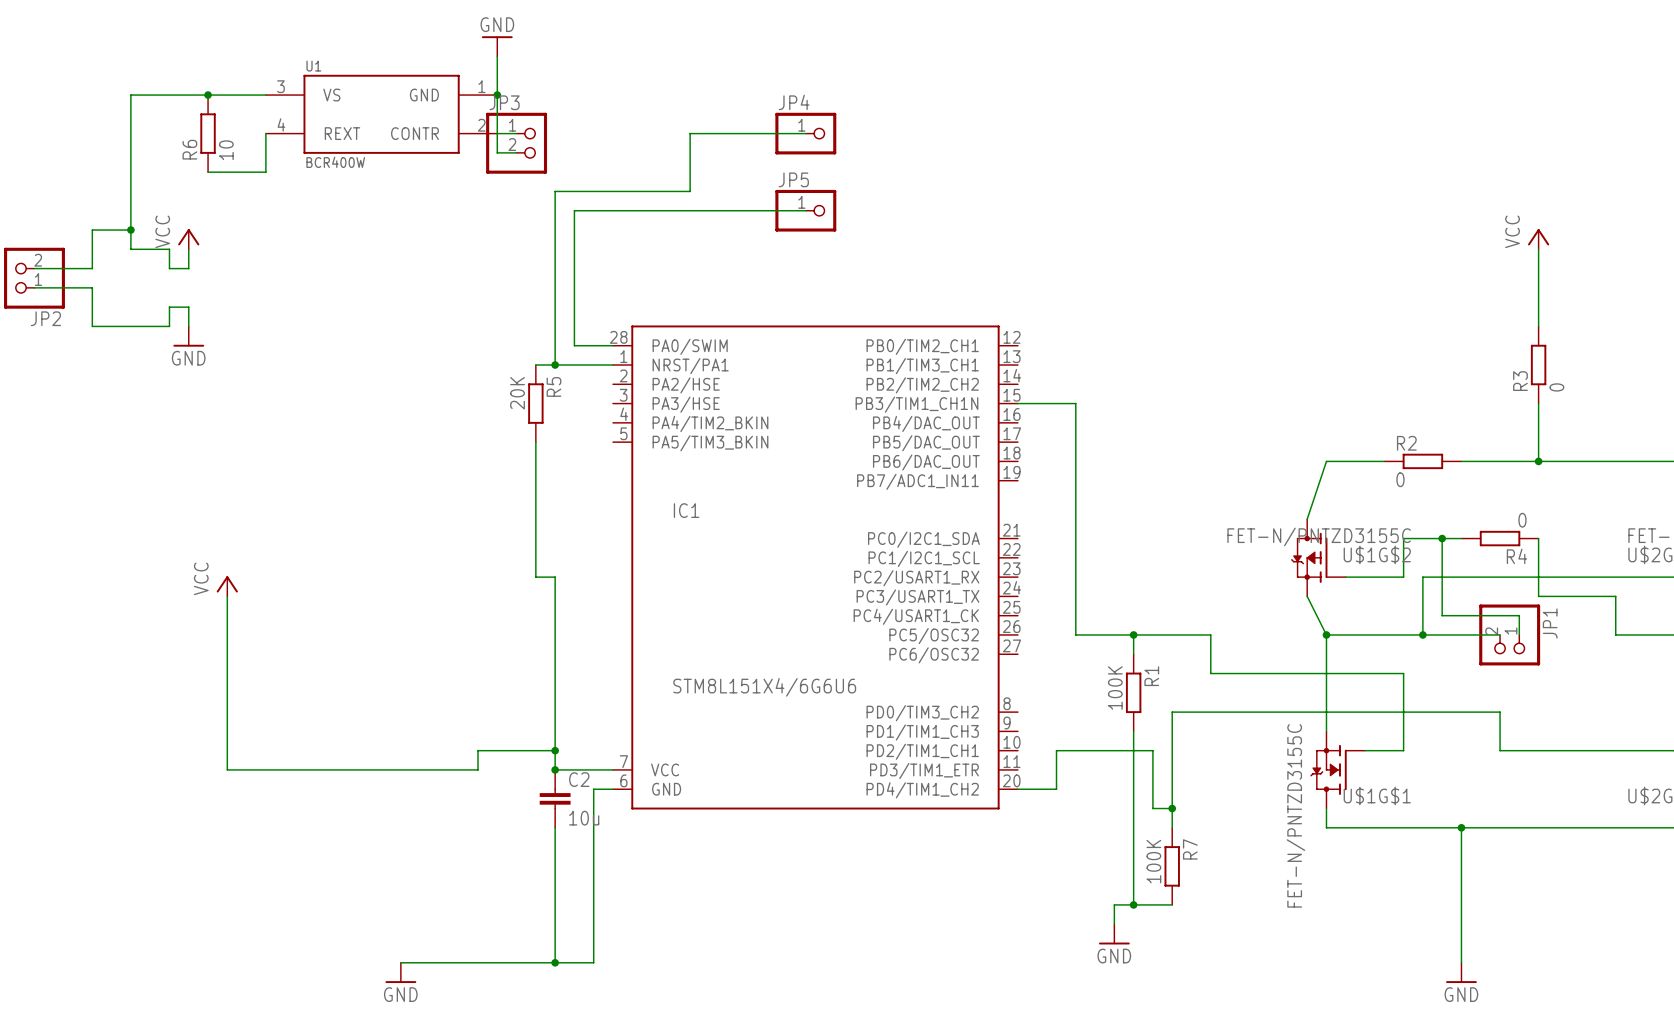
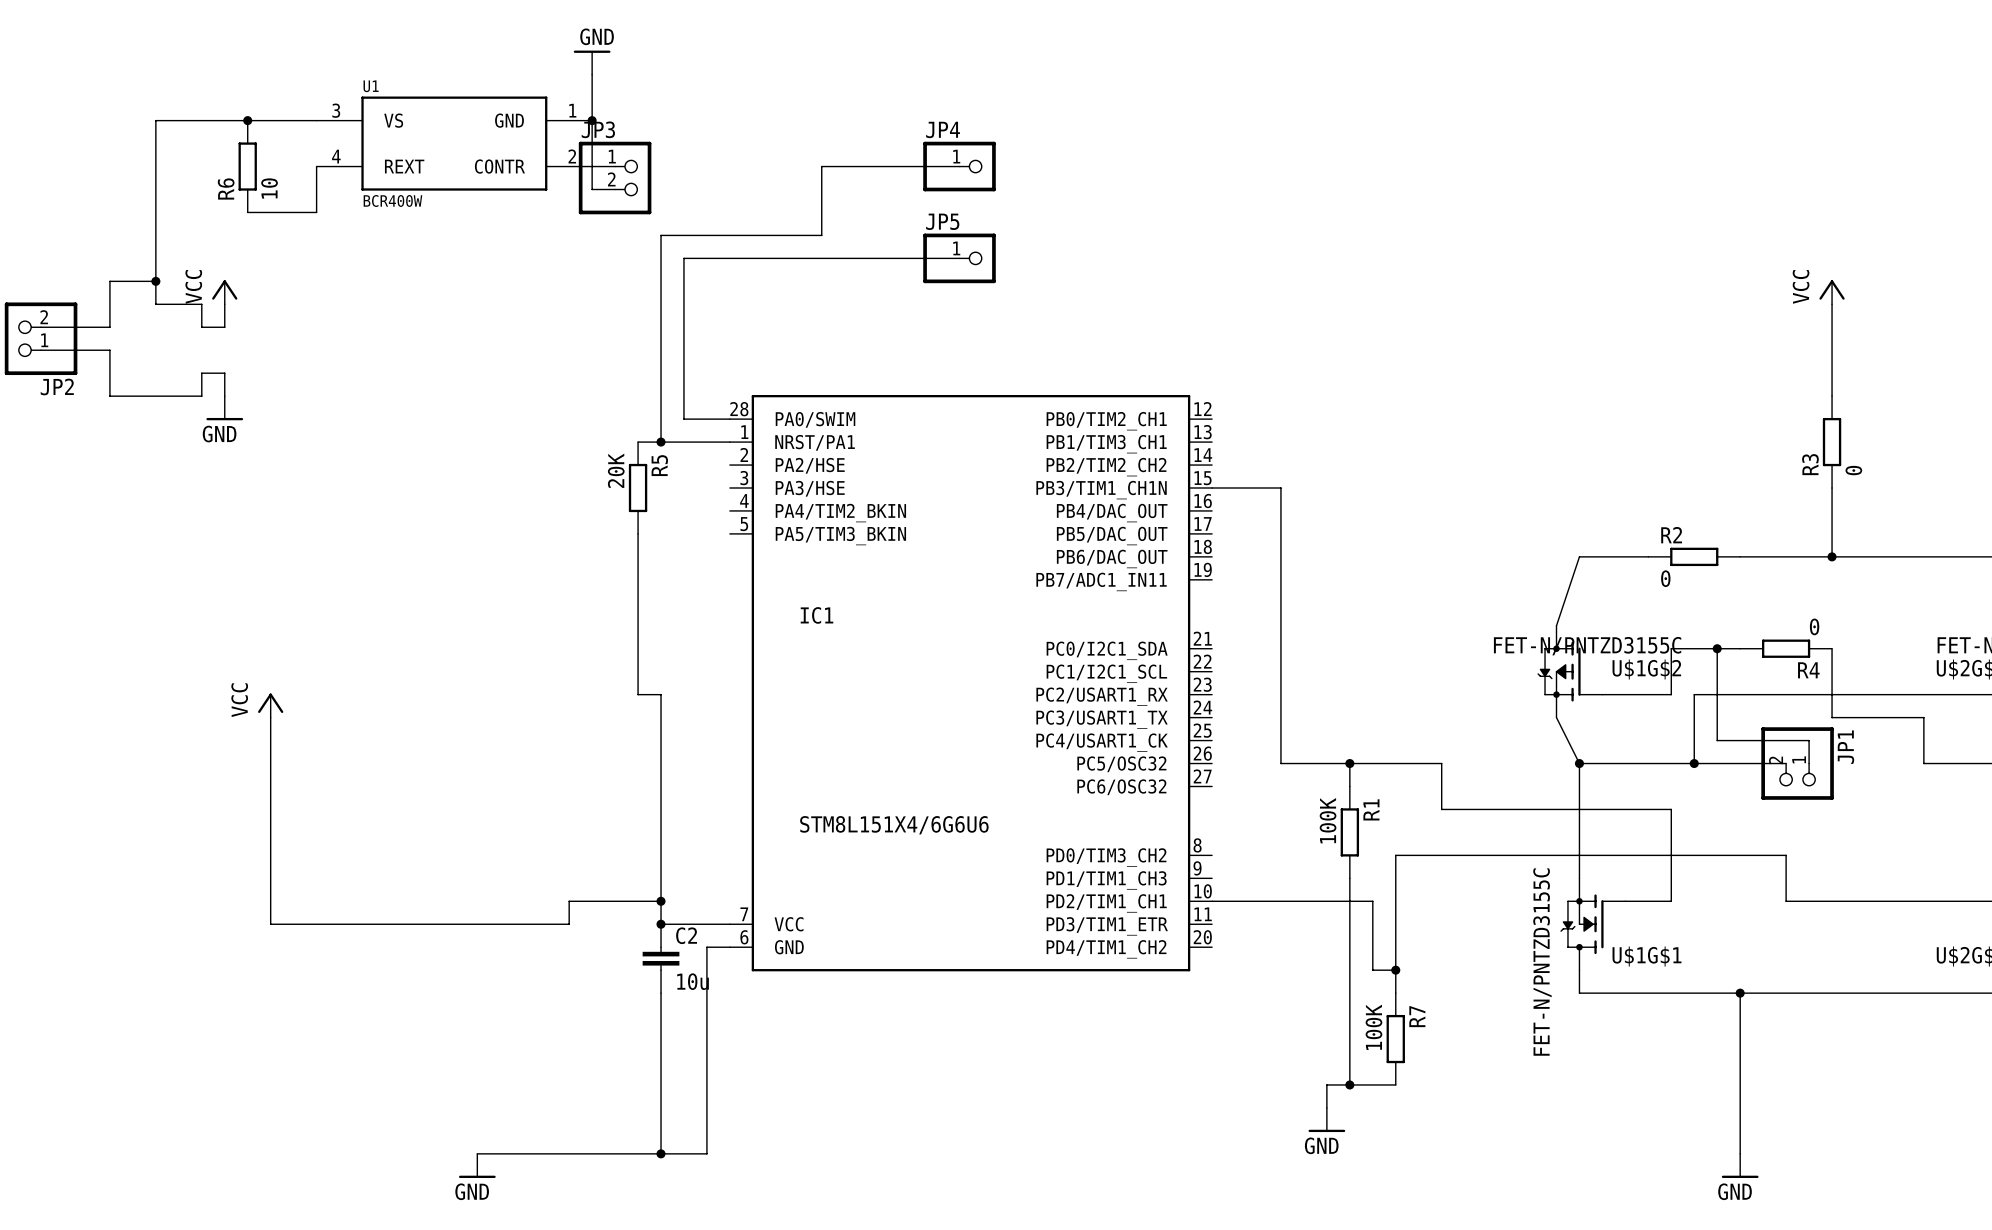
wire: (1056, 750) (1056, 789) (1017, 789) -> (1258, 901) (1212, 901)

